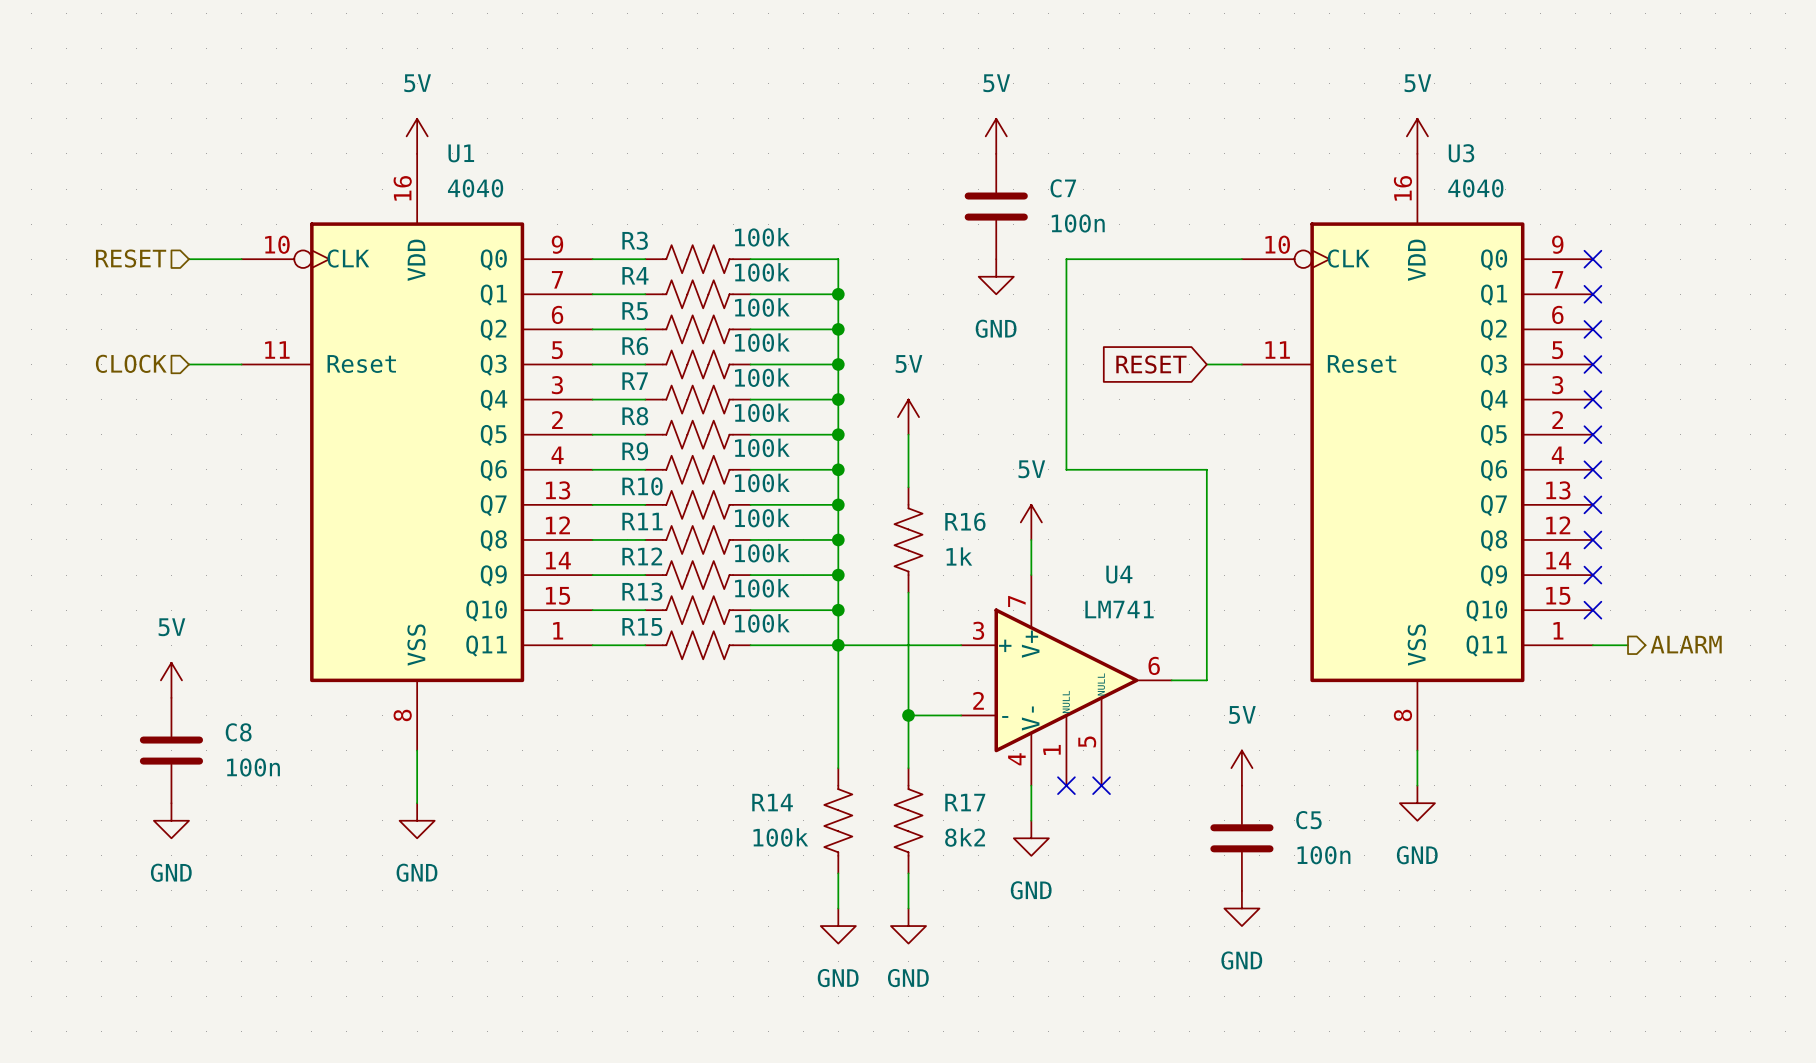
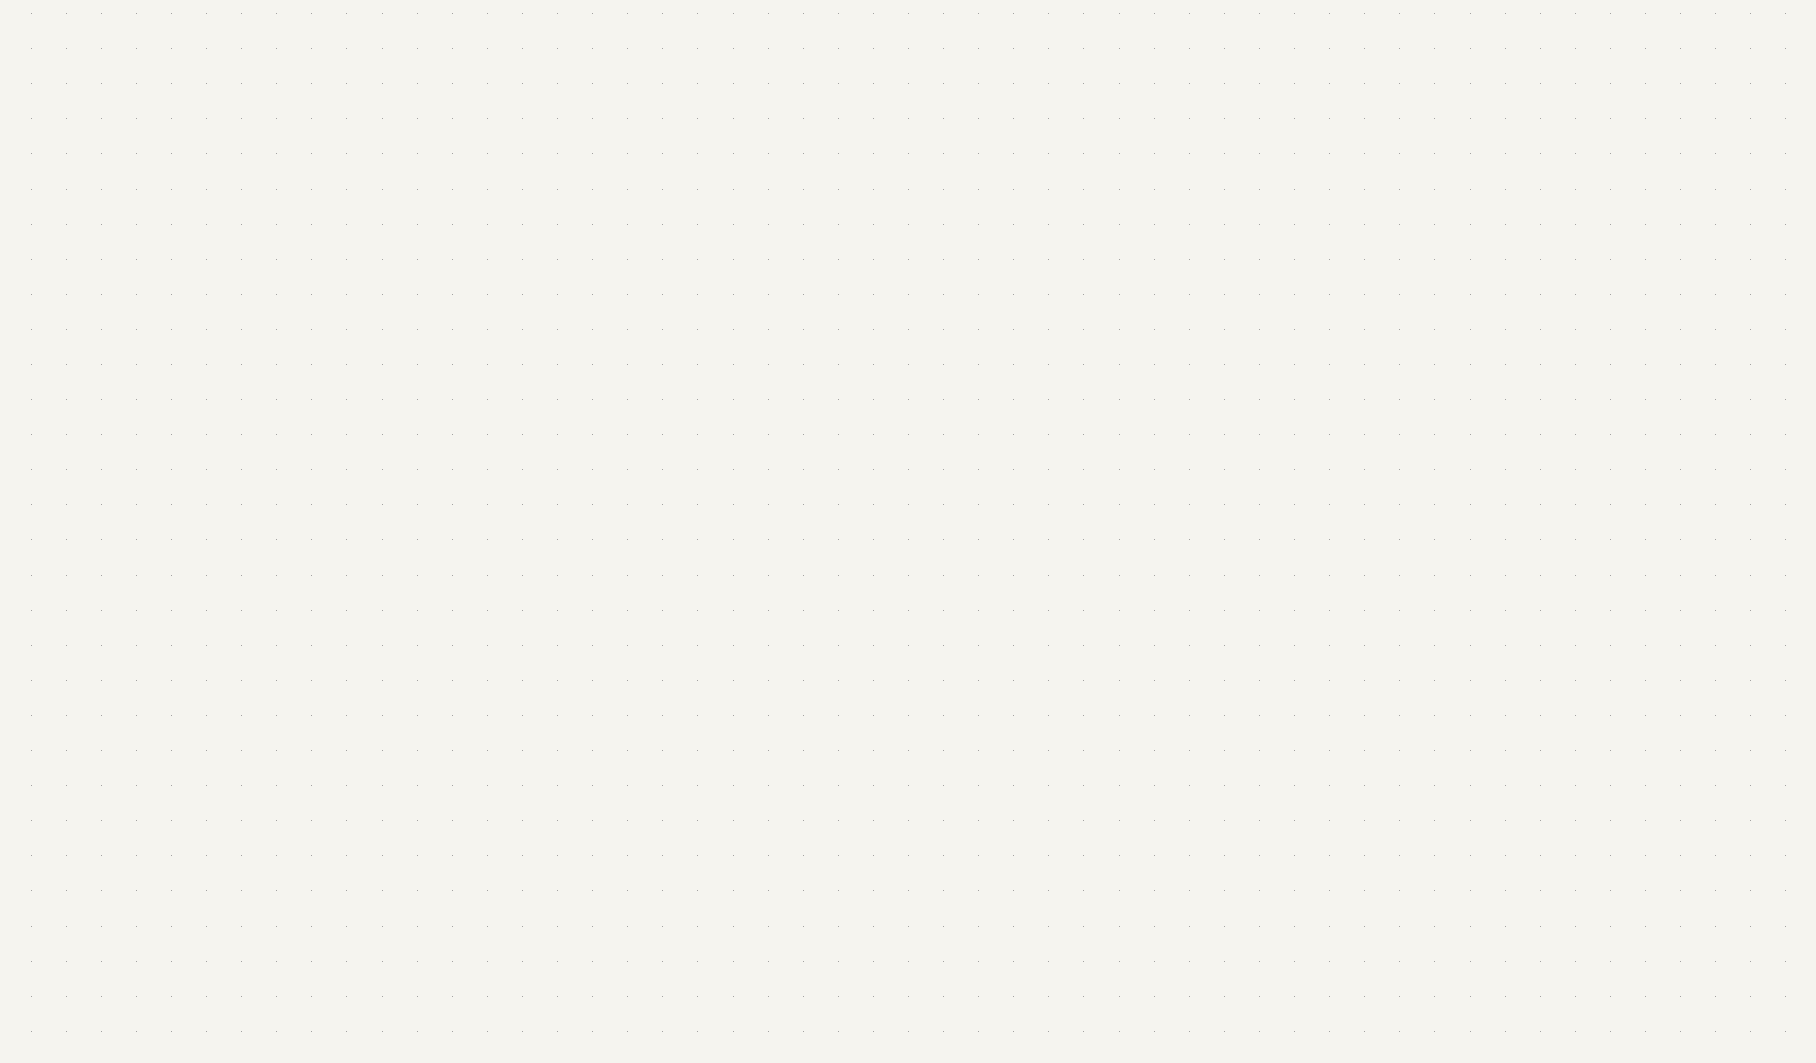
power symbol: 5V (417, 136) -> none
power symbol: 5V (996, 136) -> none
power symbol: 5V (1417, 136) -> none
C7: 100n (996, 206) -> none
hierarchical label: RESET (131, 258) -> none
wire: (189, 259) (241, 259) -> none
wire: (592, 259) (645, 259) -> none
R3: 100k (697, 259) -> none
wire: (750, 259) (838, 259) (838, 768) -> none
wire: (1241, 259) (1066, 259) (1066, 469) (1206, 469) (1206, 680) (1171, 680) -> none
no-connect mark: (1592, 259) -> none
power symbol: GND (996, 276) -> none
wire: (592, 294) (645, 294) -> none
R4: 100k (697, 294) -> none
wire: (750, 294) (838, 294) -> none
junction: (838, 294) -> none
no-connect mark: (1592, 294) -> none
wire: (592, 329) (645, 329) -> none
R5: 100k (697, 329) -> none
wire: (750, 329) (838, 329) -> none
junction: (838, 329) -> none
no-connect mark: (1592, 329) -> none
hierarchical label: CLOCK (131, 363) -> none
wire: (189, 364) (241, 364) -> none
wire: (592, 364) (645, 364) -> none
R6: 100k (697, 364) -> none
wire: (750, 364) (838, 364) -> none
junction: (838, 364) -> none
global label: RESET (1151, 364) -> none
wire: (1206, 364) (1241, 364) -> none
no-connect mark: (1592, 364) -> none
wire: (592, 399) (645, 399) -> none
R7: 100k (697, 399) -> none
wire: (750, 399) (838, 399) -> none
junction: (838, 399) -> none
no-connect mark: (1592, 399) -> none
power symbol: 5V (908, 417) -> none
wire: (592, 434) (645, 434) -> none
R8: 100k (697, 434) -> none
wire: (750, 434) (838, 434) -> none
junction: (838, 434) -> none
wire: (908, 434) (908, 487) -> none
no-connect mark: (1592, 434) -> none
U1: 4040 (417, 452) -> none
U3: 4040 (1417, 452) -> none
wire: (592, 469) (645, 469) -> none
R9: 100k (697, 469) -> none
wire: (750, 469) (838, 469) -> none
junction: (838, 469) -> none
no-connect mark: (1592, 469) -> none
wire: (592, 504) (645, 504) -> none
R10: 100k (697, 504) -> none
wire: (750, 504) (838, 504) -> none
junction: (838, 504) -> none
no-connect mark: (1592, 504) -> none
power symbol: 5V (1031, 522) -> none
wire: (592, 539) (645, 539) -> none
R11: 100k (697, 539) -> none
wire: (750, 539) (838, 539) -> none
junction: (838, 539) -> none
R16: 1k (908, 539) -> none
wire: (1031, 539) (1031, 575) -> none
no-connect mark: (1592, 539) -> none
wire: (592, 575) (645, 575) -> none
R12: 100k (697, 575) -> none
wire: (750, 575) (838, 575) -> none
junction: (838, 575) -> none
no-connect mark: (1592, 575) -> none
wire: (908, 592) (908, 768) -> none
wire: (592, 610) (645, 610) -> none
R13: 100k (697, 610) -> none
wire: (750, 610) (838, 610) -> none
junction: (838, 610) -> none
no-connect mark: (1592, 610) -> none
hierarchical label: ALARM (1686, 644) -> none
wire: (592, 645) (645, 645) -> none
R15: 100k (697, 645) -> none
wire: (750, 645) (961, 645) -> none
junction: (838, 645) -> none
wire: (1592, 645) (1628, 645) -> none
power symbol: 5V (171, 680) -> none
U4: LM741 (1066, 680) -> none
wire: (908, 715) (961, 715) -> none
junction: (908, 715) -> none
C8: 100n (171, 750) -> none
wire: (417, 750) (417, 803) -> none
wire: (1417, 750) (1417, 785) -> none
power symbol: 5V (1241, 768) -> none
wire: (1031, 785) (1031, 820) -> none
no-connect mark: (1066, 785) -> none
no-connect mark: (1101, 785) -> none
power symbol: GND (1417, 803) -> none
power symbol: GND (171, 820) -> none
power symbol: GND (417, 820) -> none
R14: 100k (838, 820) -> none
R17: 8k2 (908, 820) -> none
power symbol: GND (1031, 838) -> none
C5: 100n (1241, 838) -> none
wire: (838, 873) (838, 908) -> none
wire: (908, 873) (908, 908) -> none
power symbol: GND (1241, 908) -> none
power symbol: GND (838, 926) -> none
power symbol: GND (908, 926) -> none

